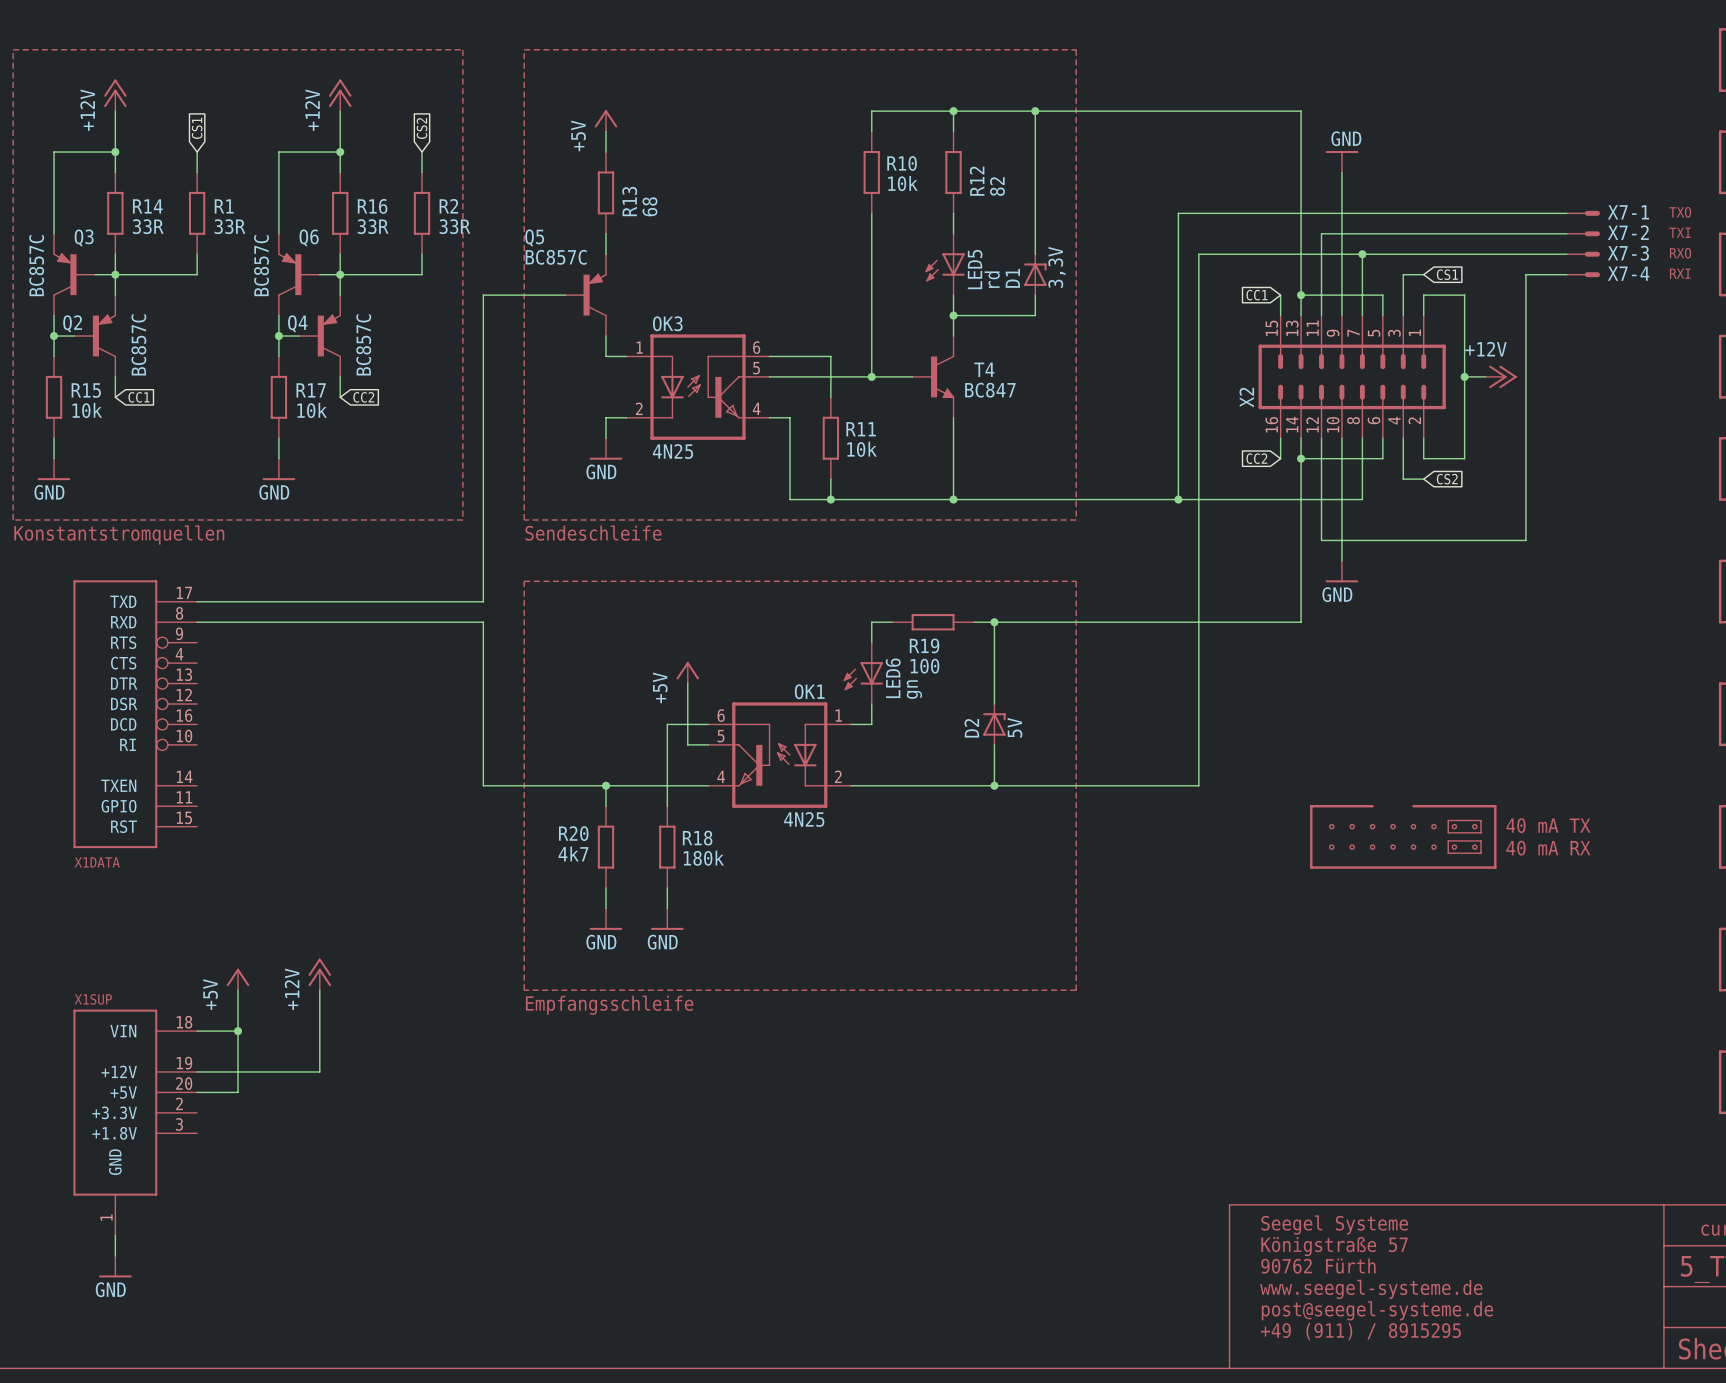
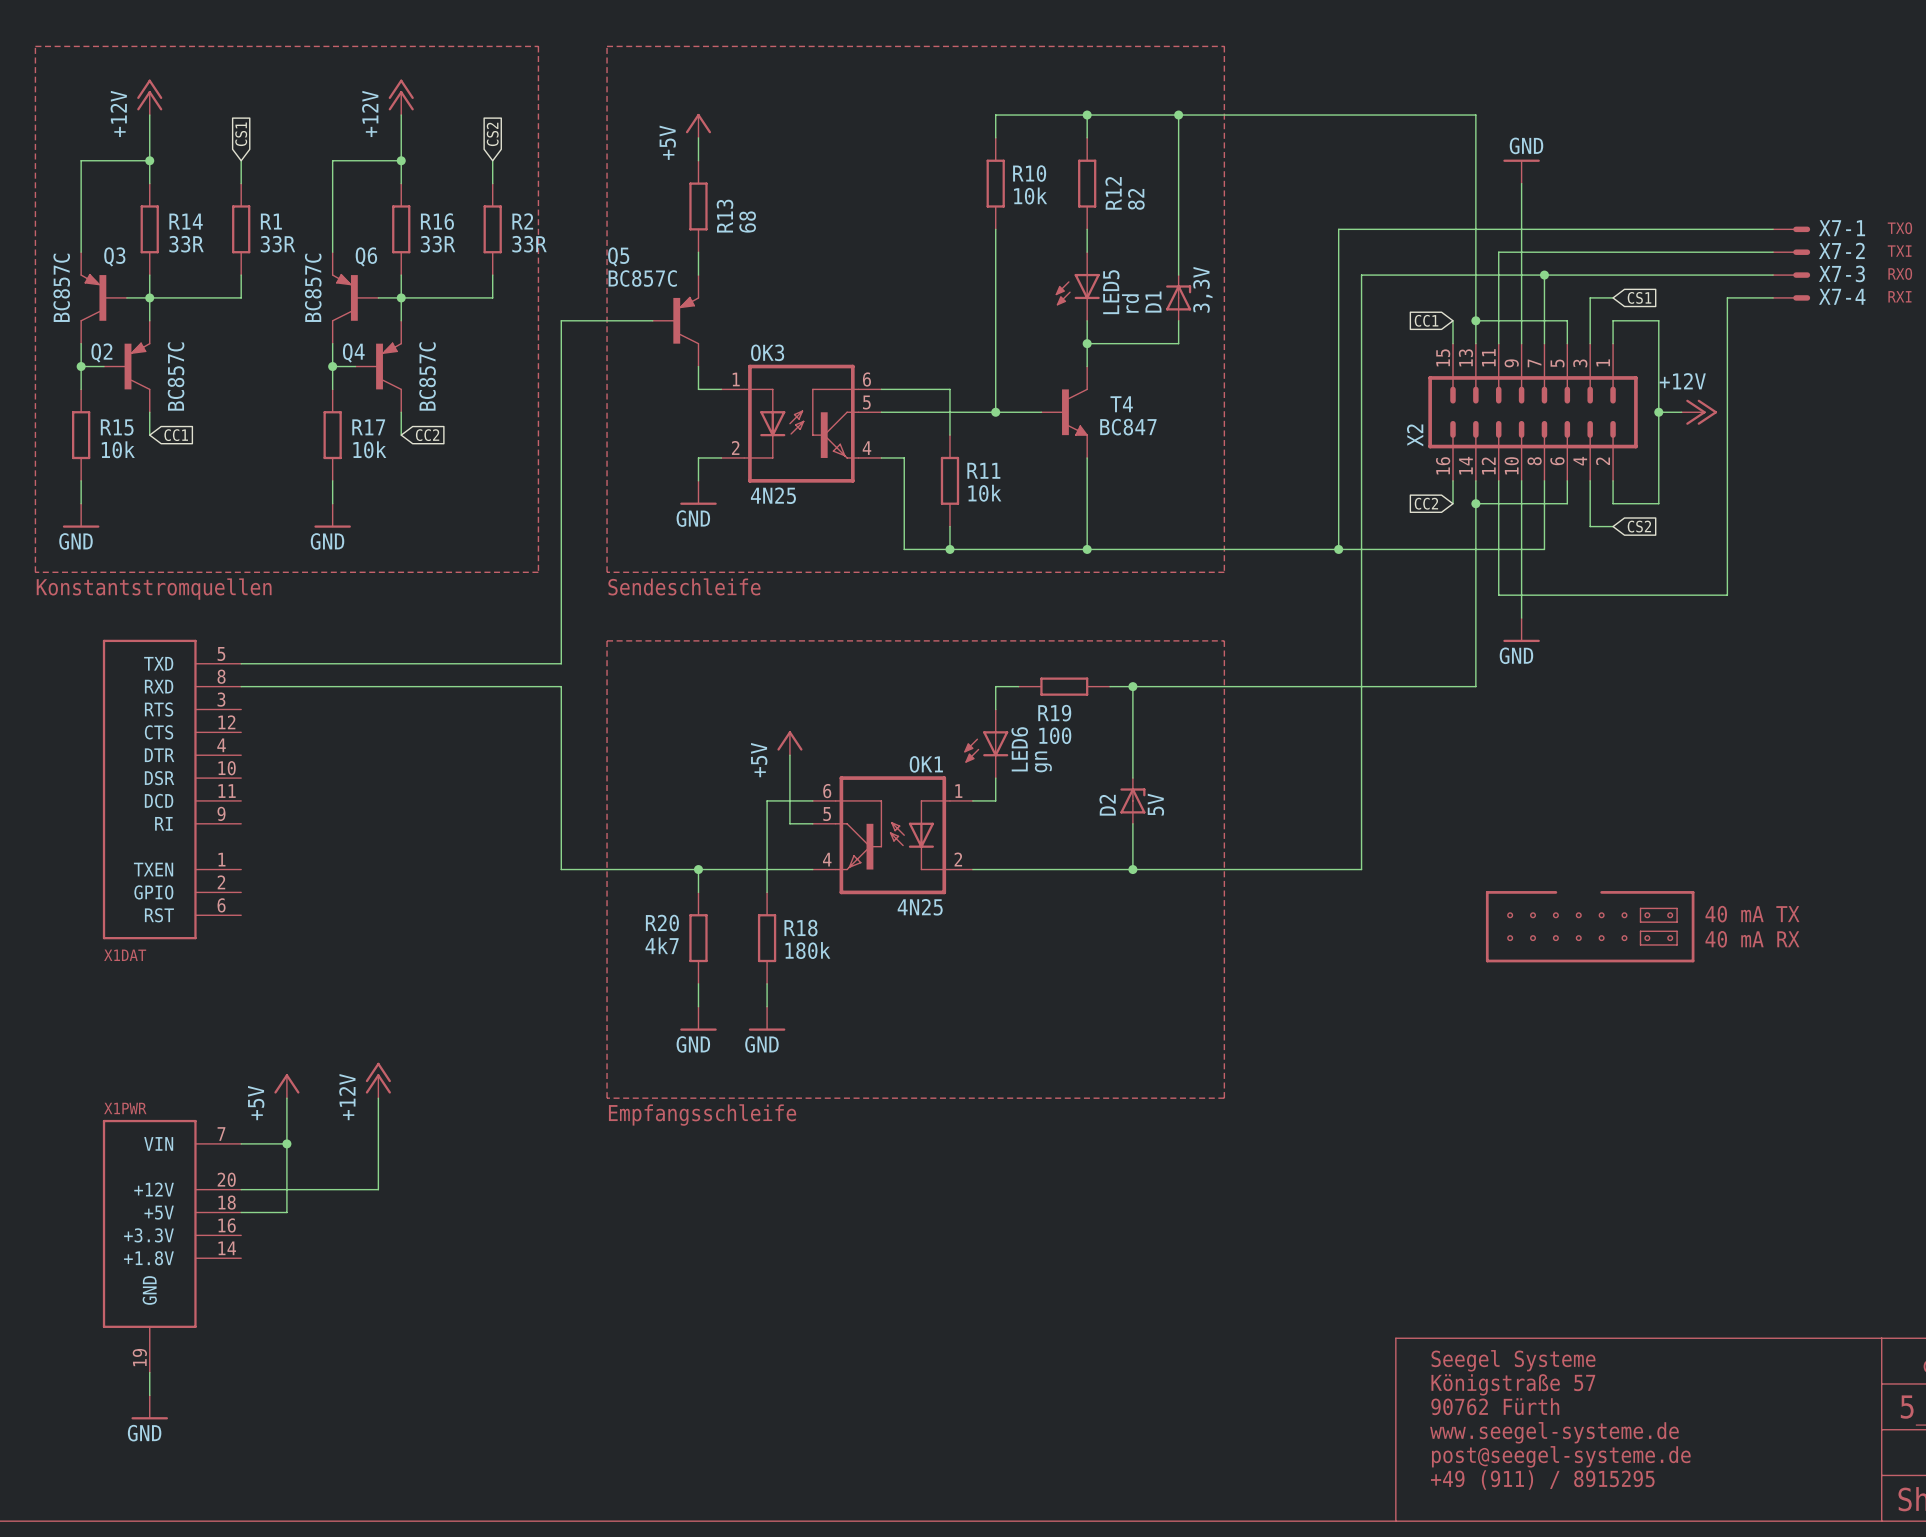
X1DATA: (135, 714) -> none
X1DAT: none -> (172, 789)
X1SUP name: X1SUP (93, 999) -> X1PWR (125, 1108)
X1SUP pin number: 18 (184, 1022) -> 7 (221, 1134)
X1SUP pin number: 19 (184, 1063) -> 20 (226, 1179)
X1SUP pin number: 20 (184, 1083) -> 18 (227, 1202)
X1SUP pin number: 2 (179, 1103) -> 16 (227, 1225)
X1SUP pin number: 3 (179, 1124) -> 14 (227, 1248)
X1SUP pin number: 1 (106, 1217) -> 19 (139, 1357)

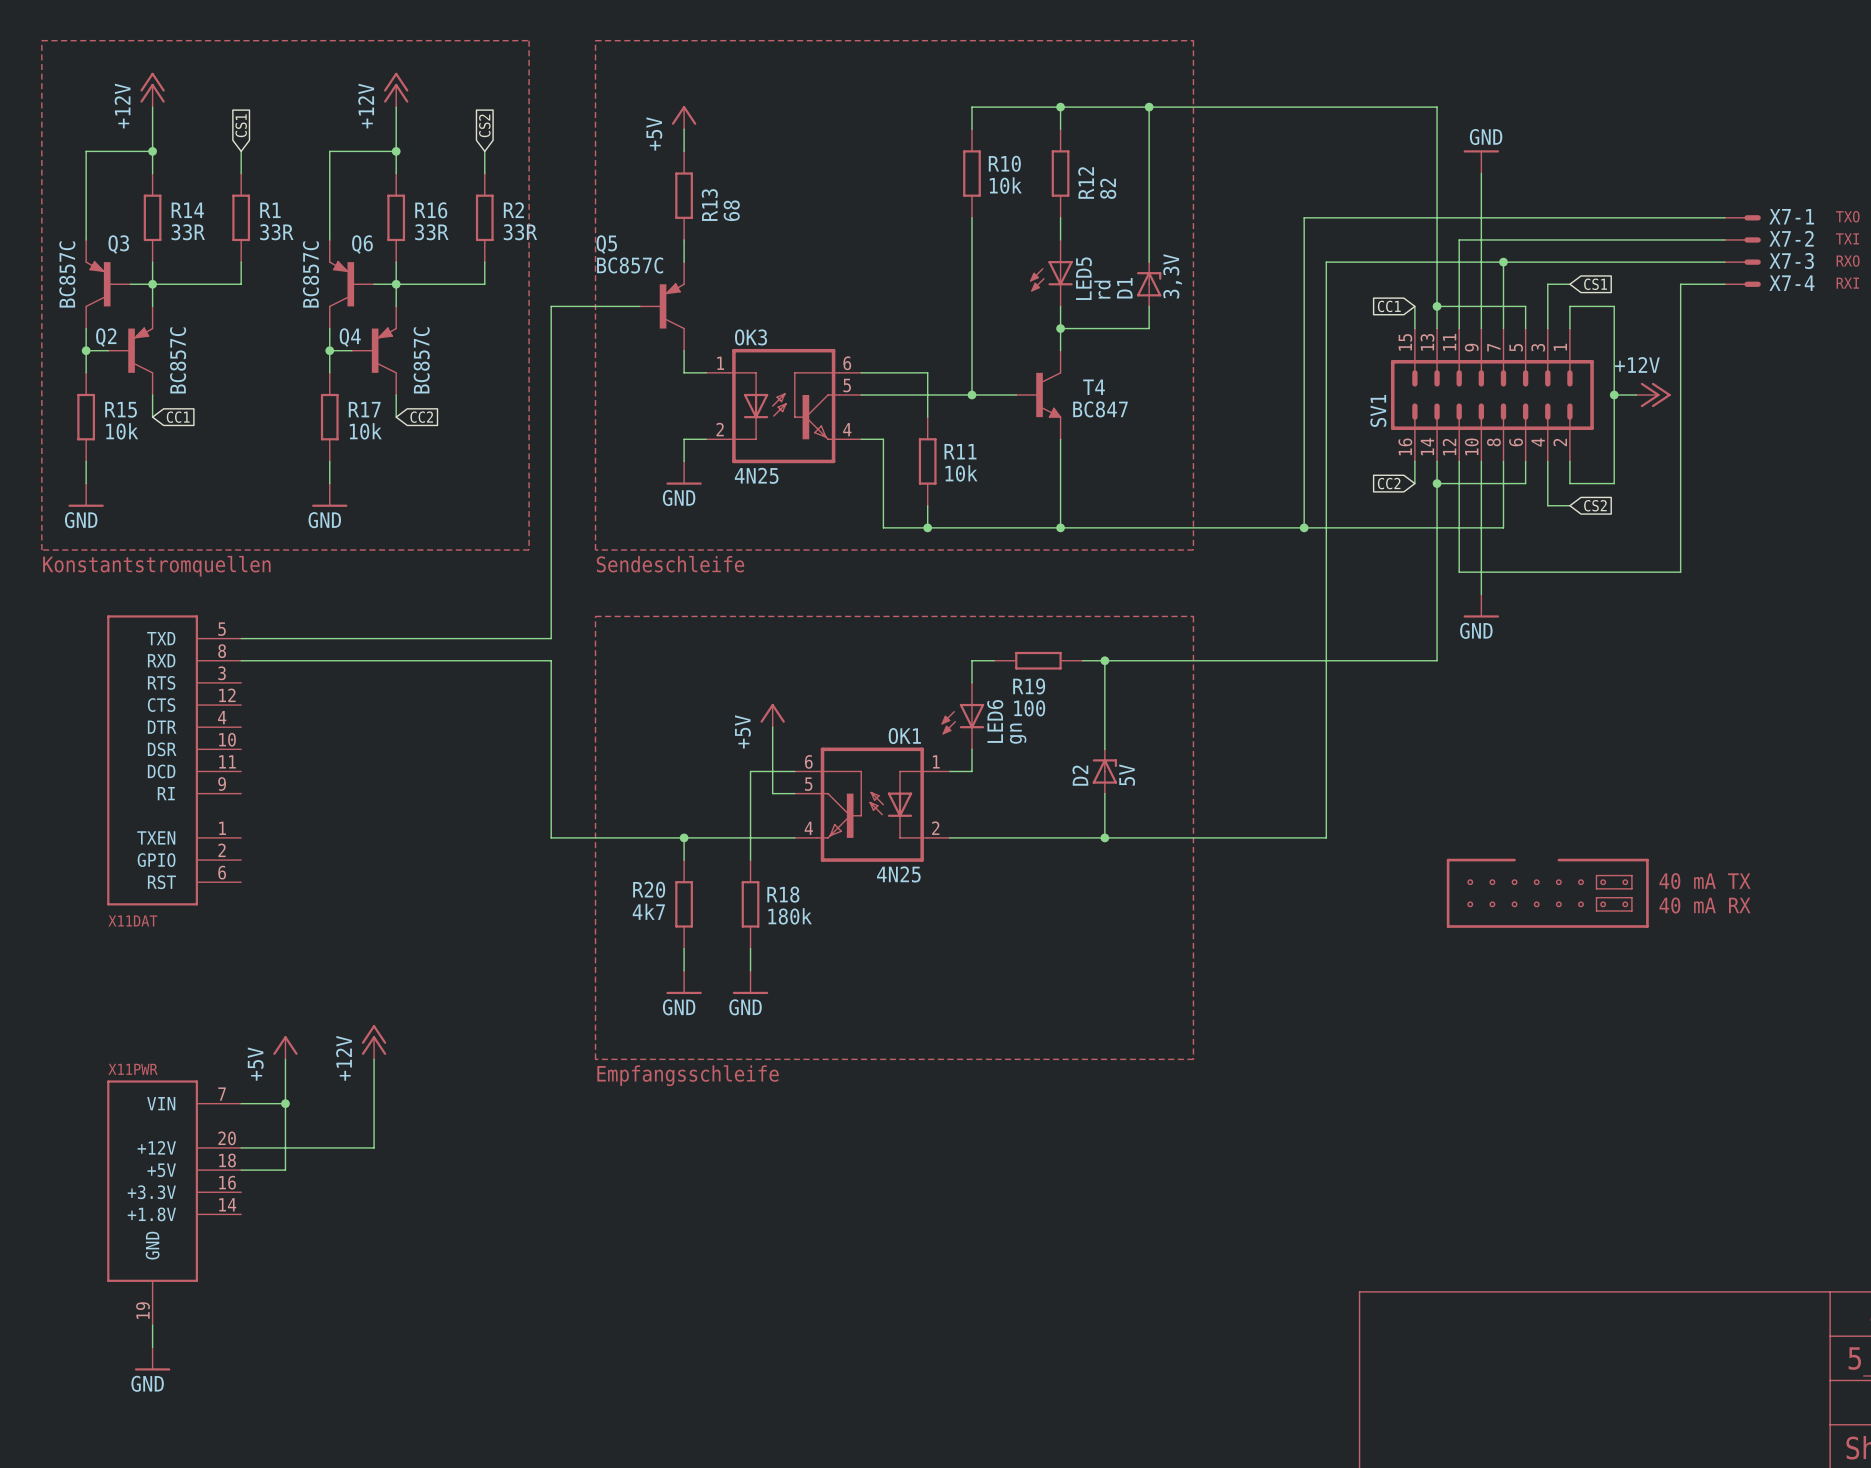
X2 name: X2 (1415, 435) -> SV1 (1378, 410)
X1DAT name: X1DAT (125, 955) -> X11DAT (132, 920)
X1PWR name: X1PWR (125, 1108) -> X11PWR (133, 1069)
text: Seegel Systeme (1513, 1360) -> none
text: Königstraße 57 (1513, 1384) -> none
text: 90762 Fürth (1495, 1406) -> none
text: www.seegel-systeme.de (1554, 1432) -> none
text: post@seegel-systeme.de (1561, 1456) -> none
text: +49 (911) / 8915295 (1542, 1479) -> none

